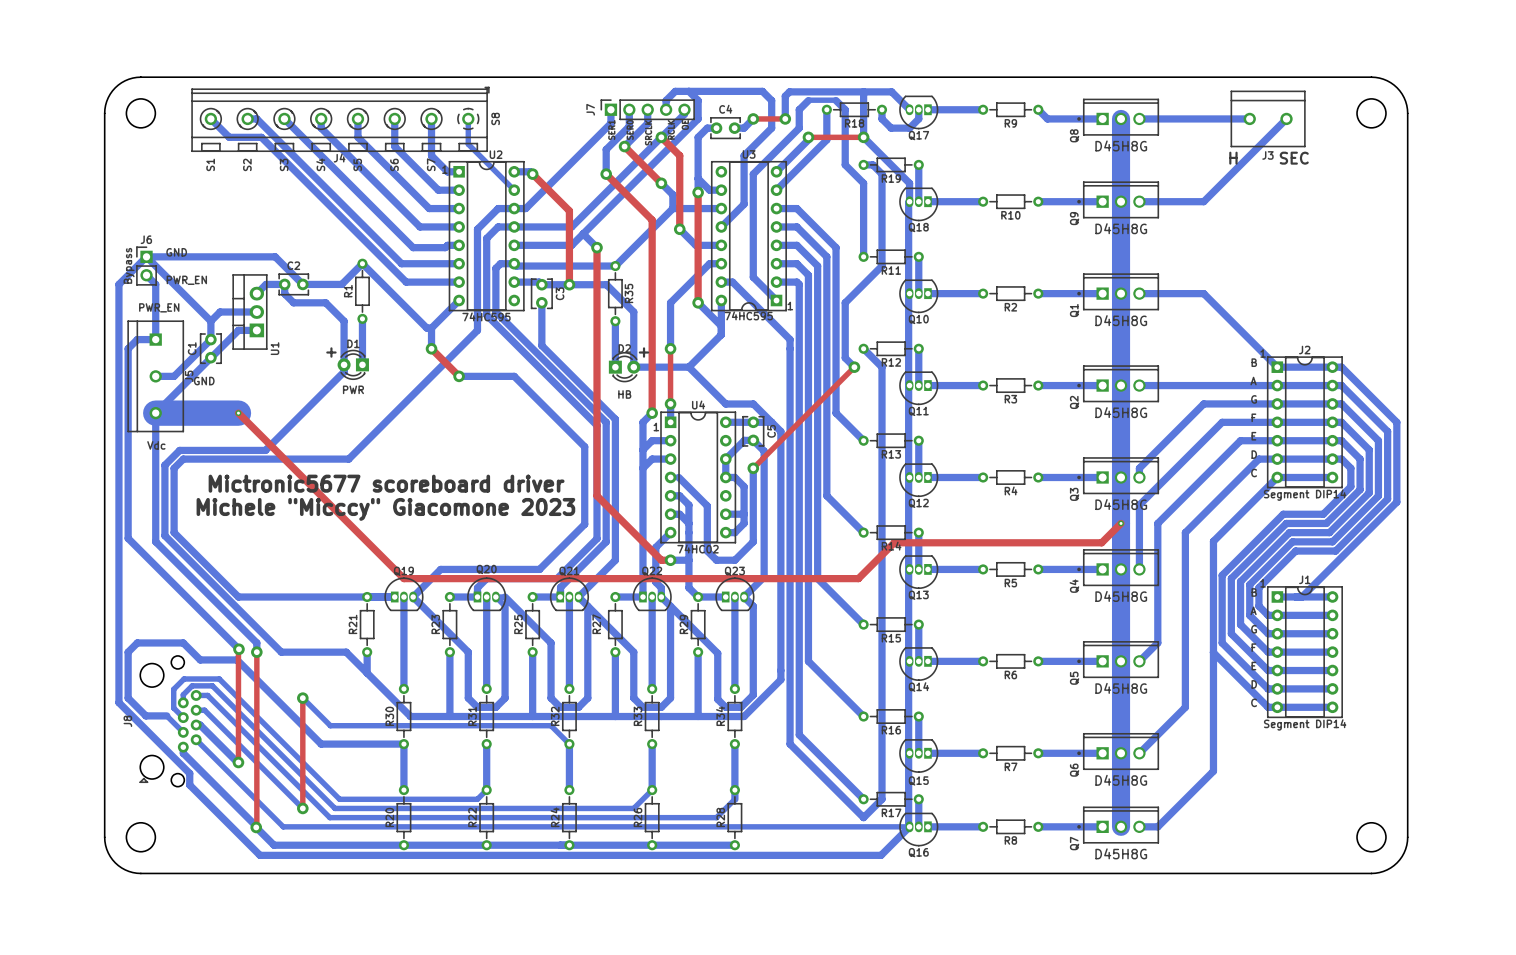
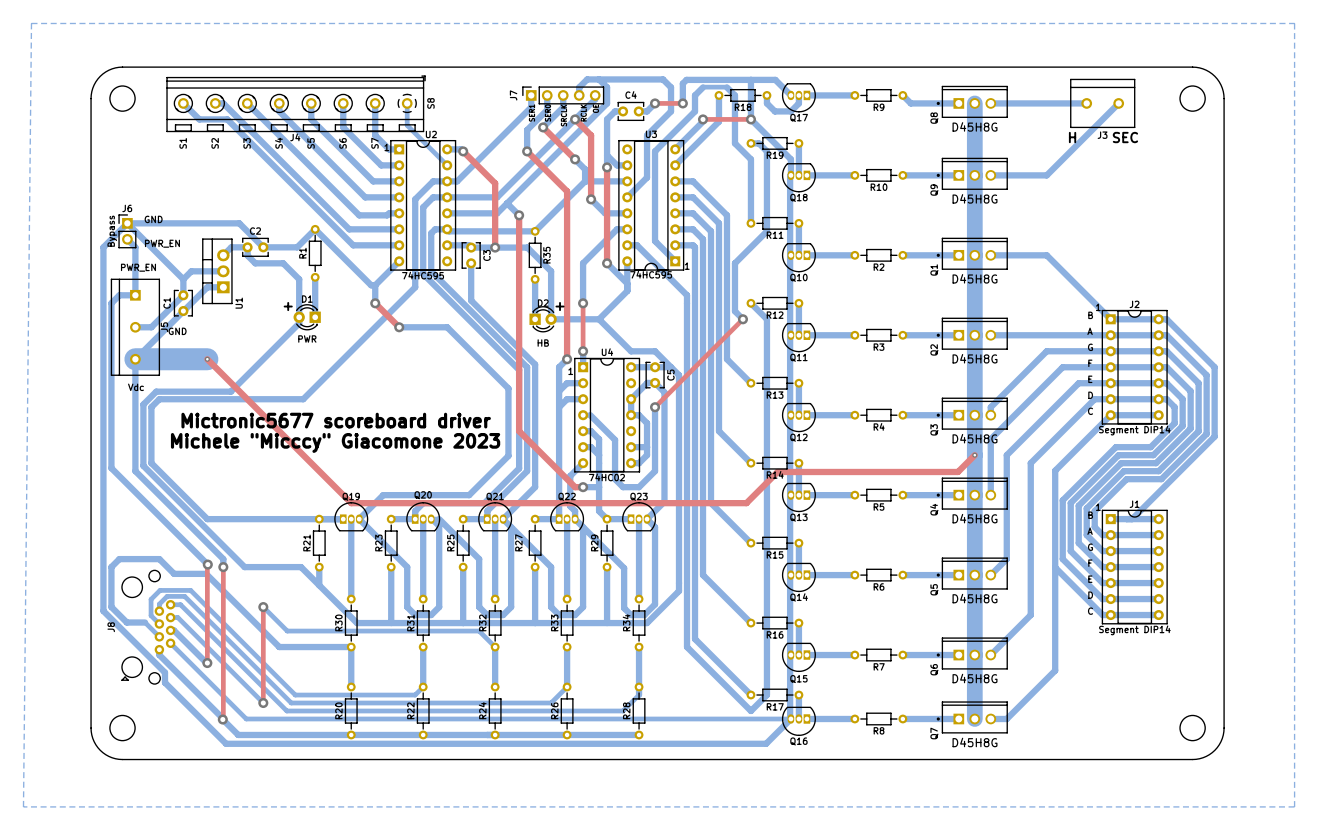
bottom zone outline: none -> (31, 23) (1294, 23) (1294, 806) (23, 806) (31, 23)

